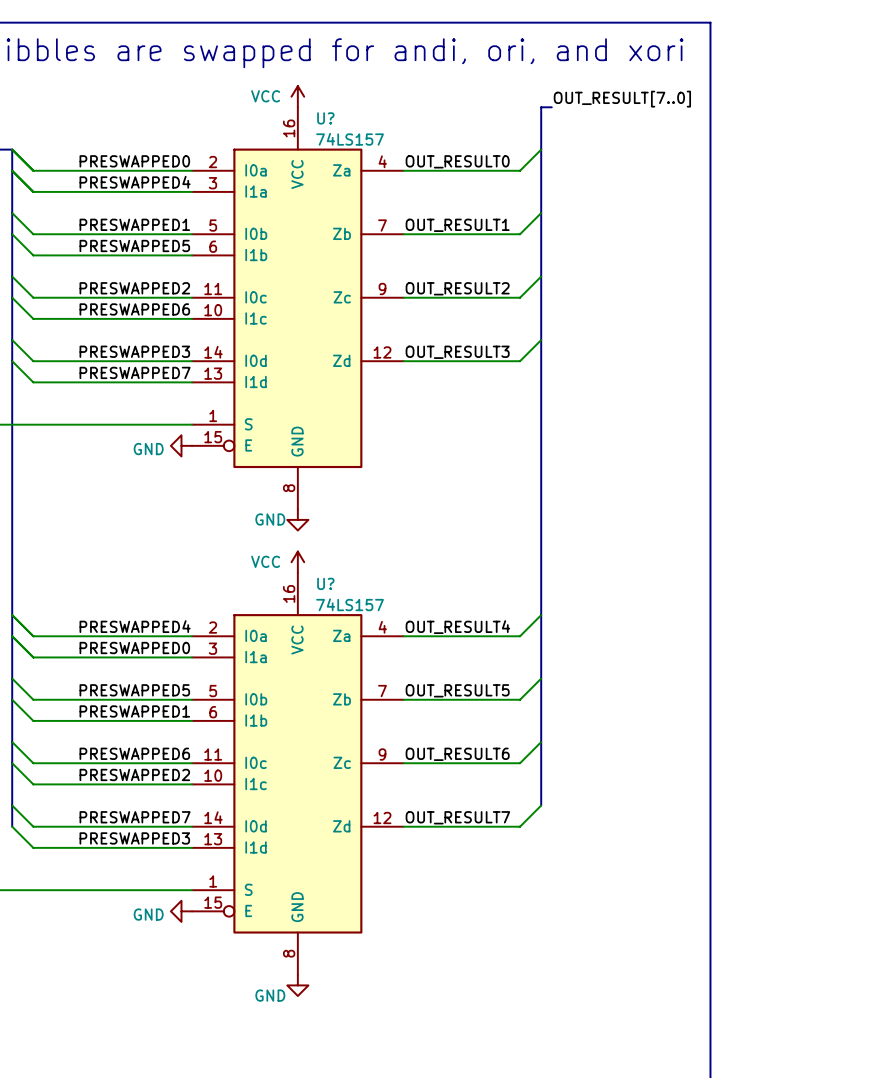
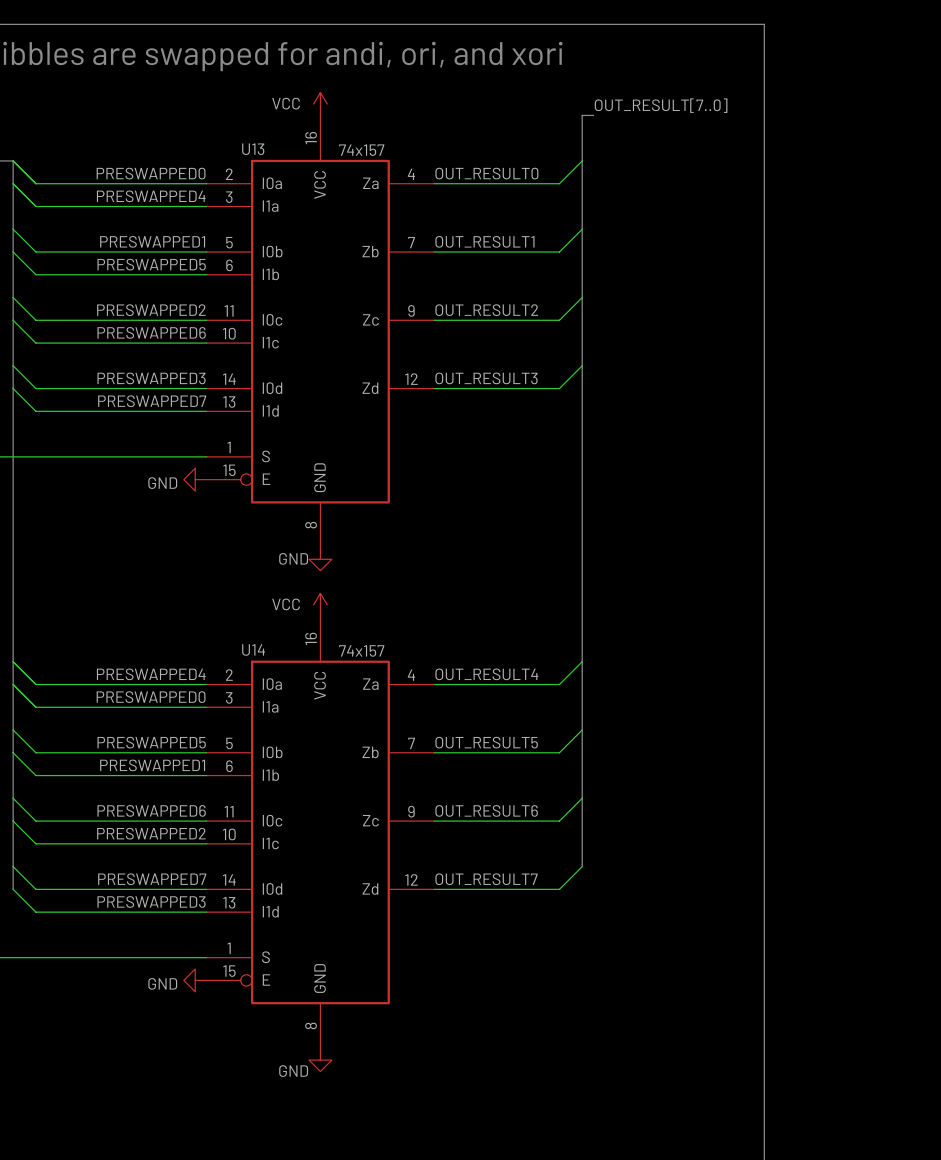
U? name: U? (325, 118) -> U13 (253, 149)
U? value: 74LS157 (350, 139) -> 74x157 (361, 150)
U? name: U? (325, 583) -> U14 (253, 650)
U? value: 74LS157 (350, 604) -> 74x157 (361, 650)

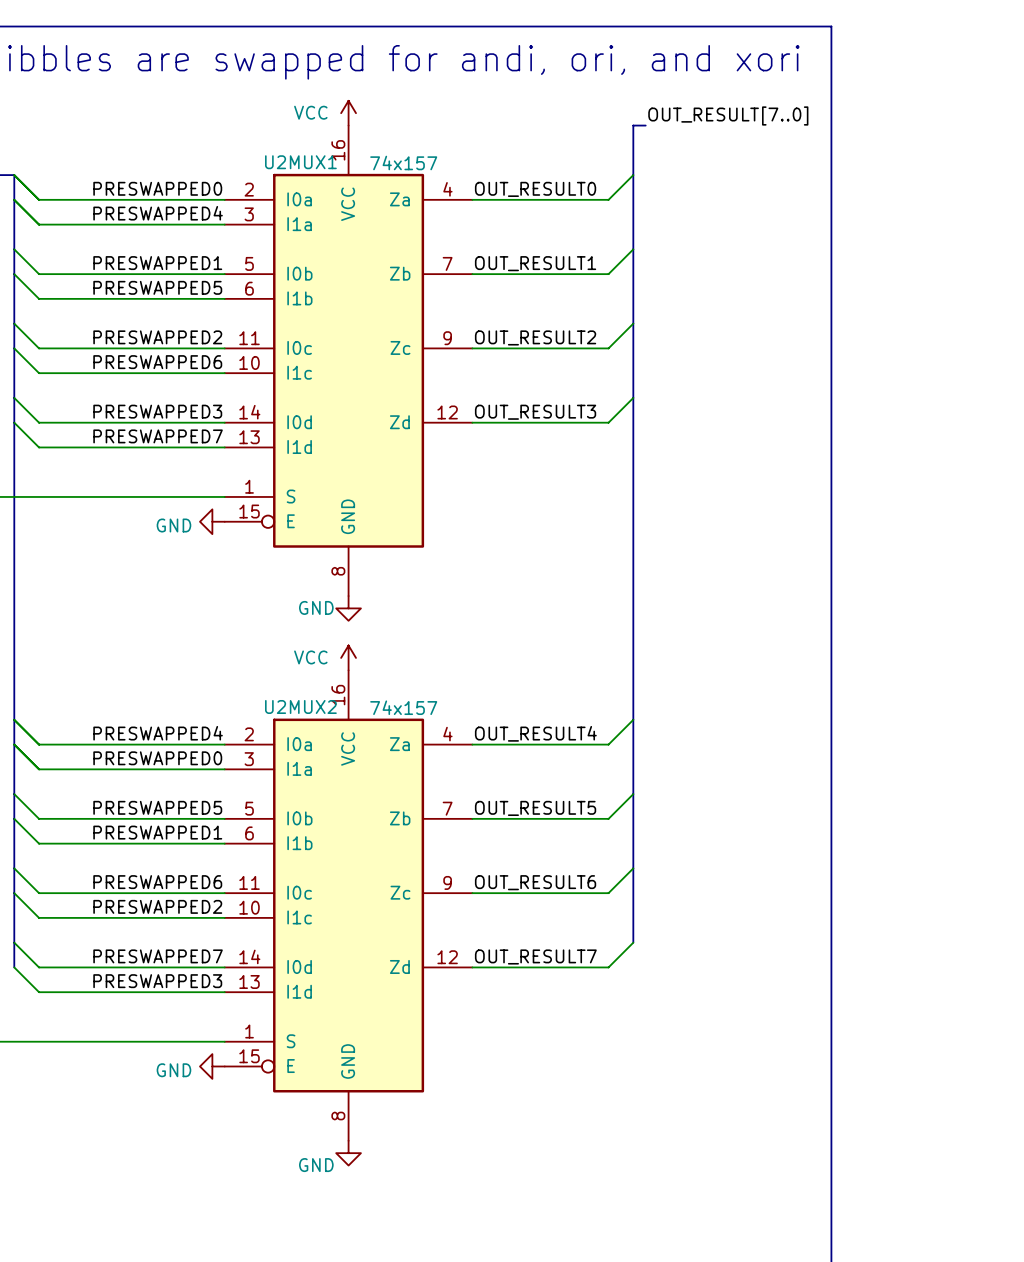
U13 name: U13 (253, 149) -> U2MUX1 (300, 162)
U14 name: U14 (253, 650) -> U2MUX2 (300, 706)

